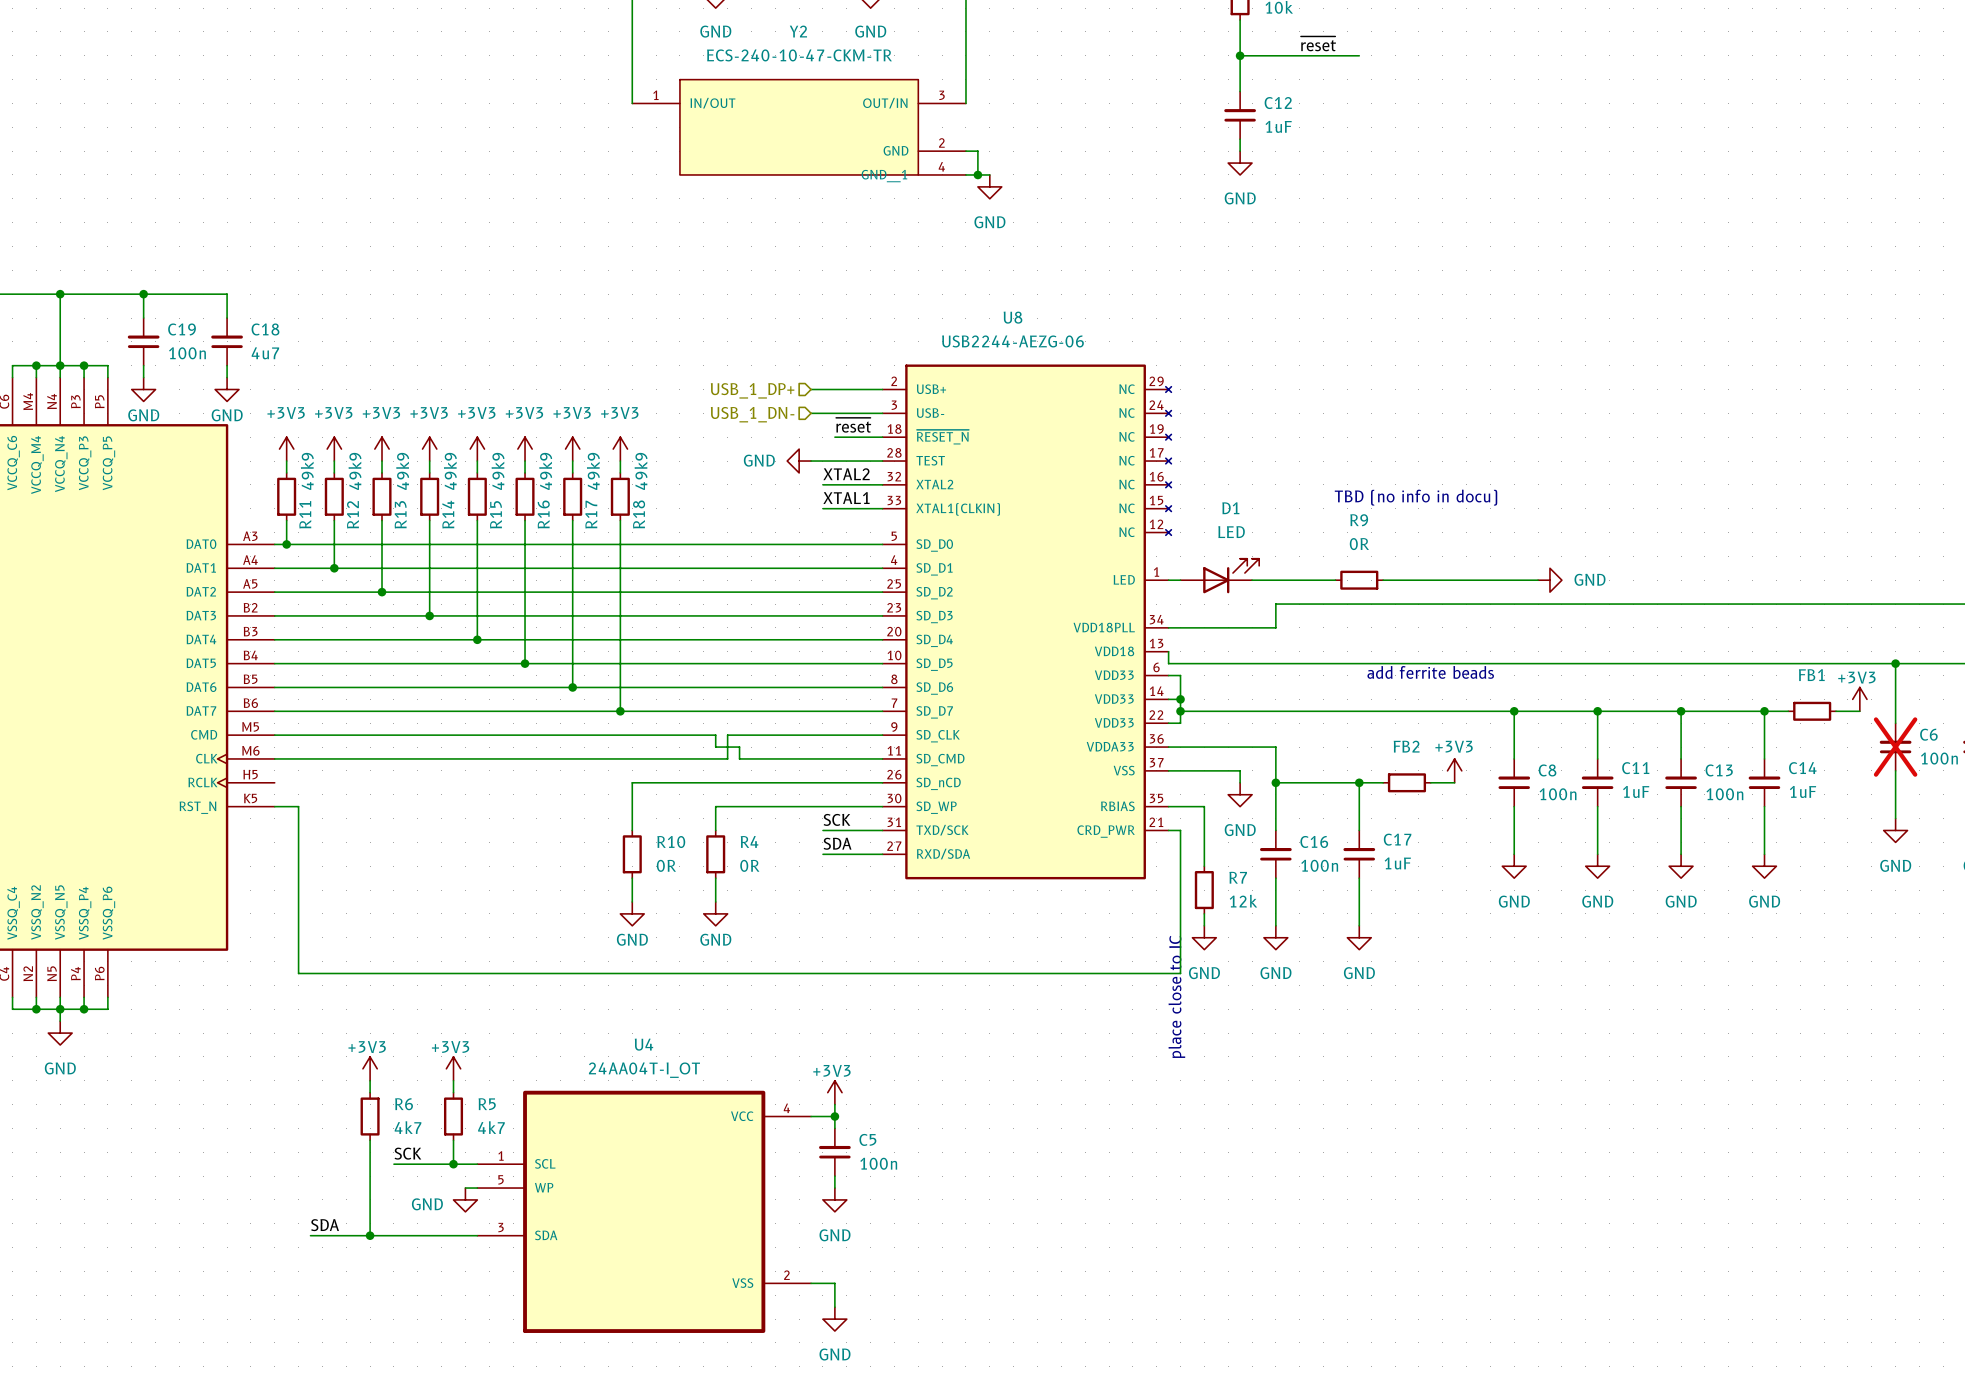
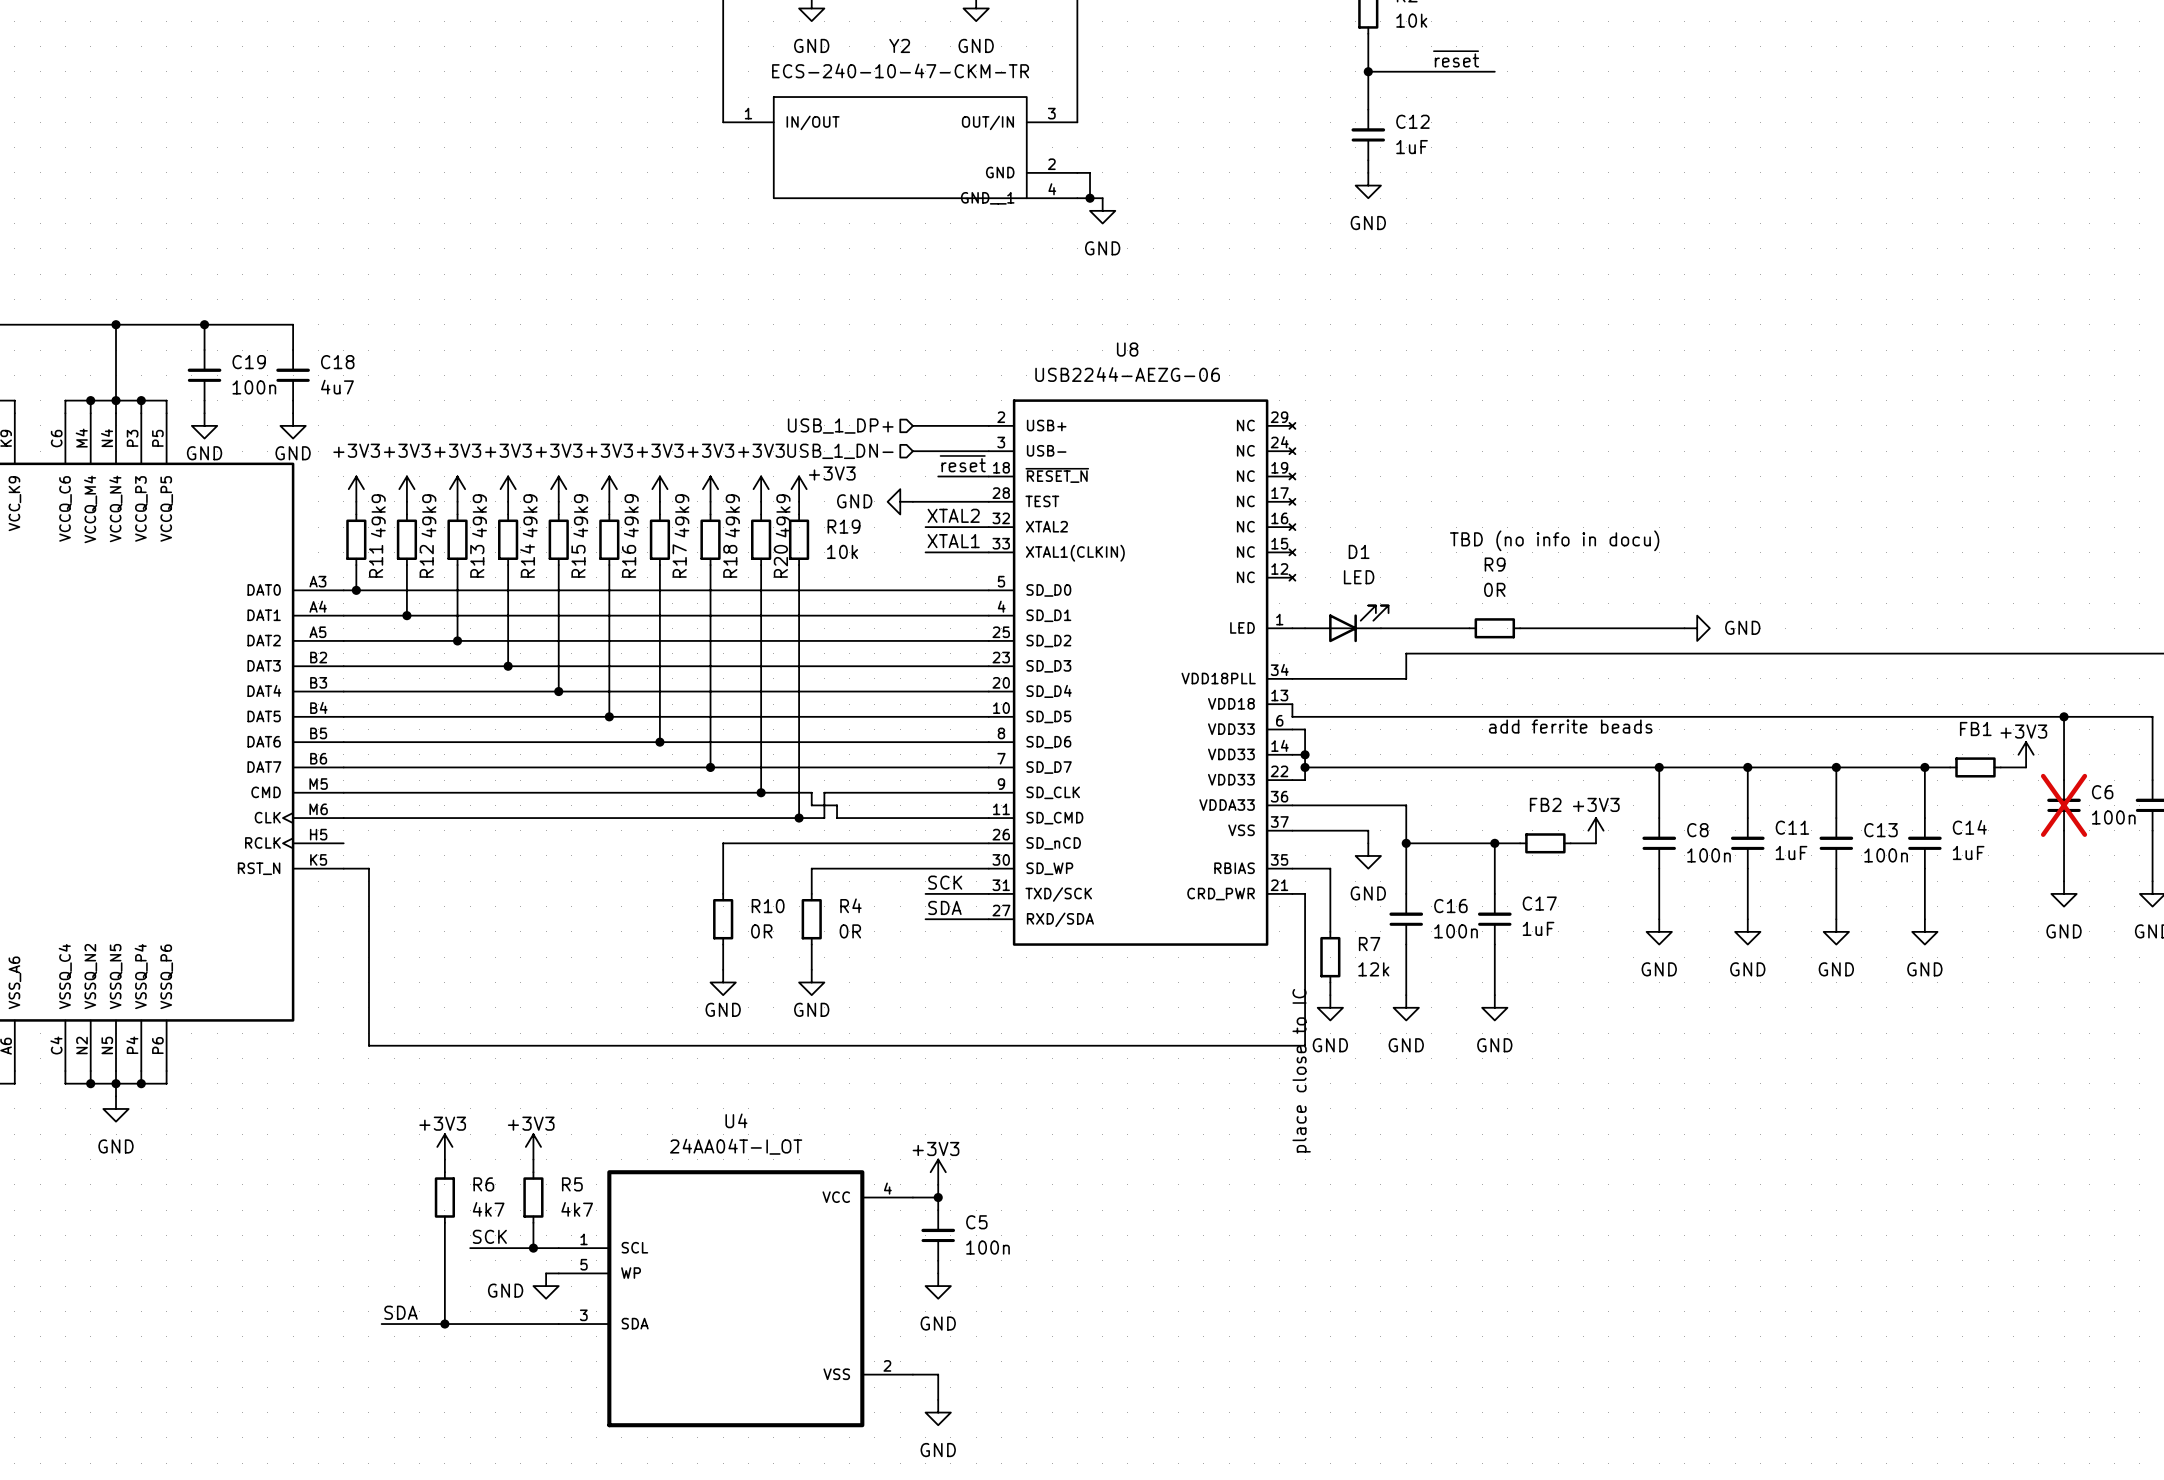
power symbol: none -> +3V3 (761, 489)
power symbol: none -> +3V3 (799, 489)
wire: none -> (761, 501) (761, 514)
wire: none -> (799, 501) (799, 514)
R20: none -> (761, 539)
R19: none -> (799, 539)
wire: none -> (761, 565) (761, 792)
wire: none -> (799, 565) (799, 818)
junction: none -> (761, 792)
junction: none -> (799, 818)

